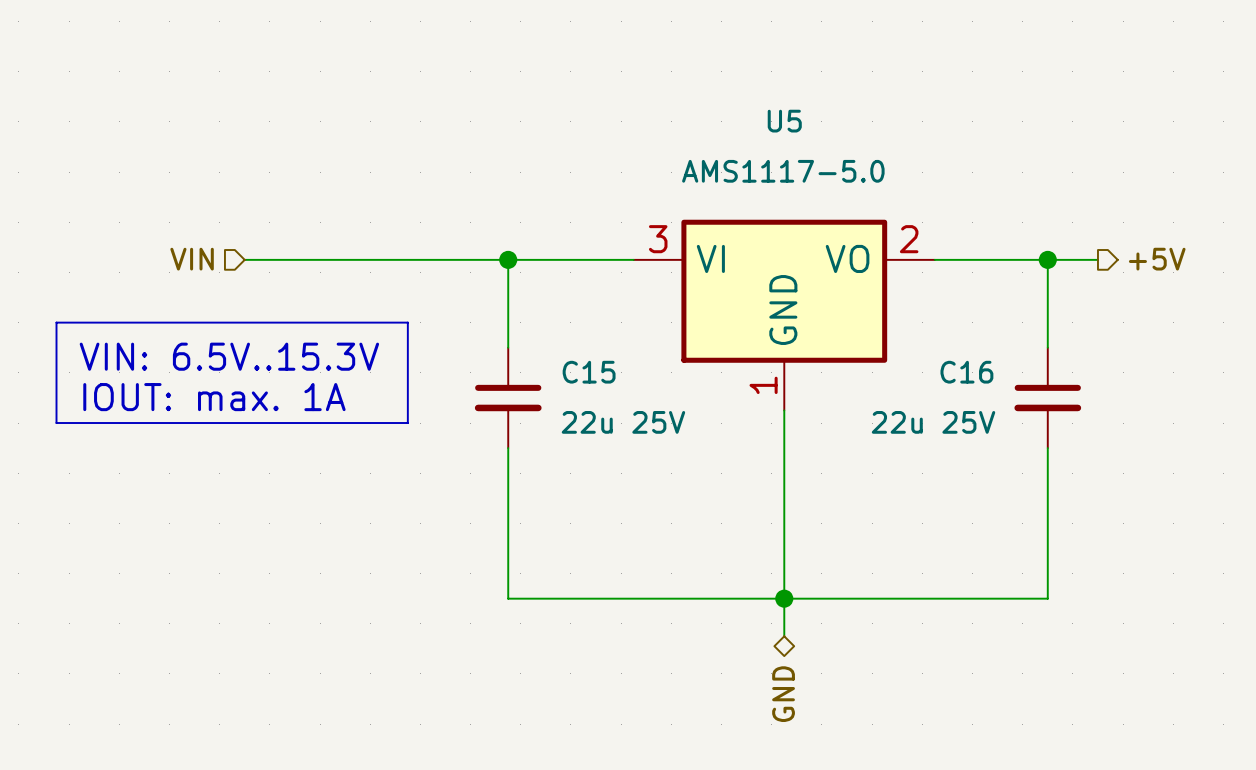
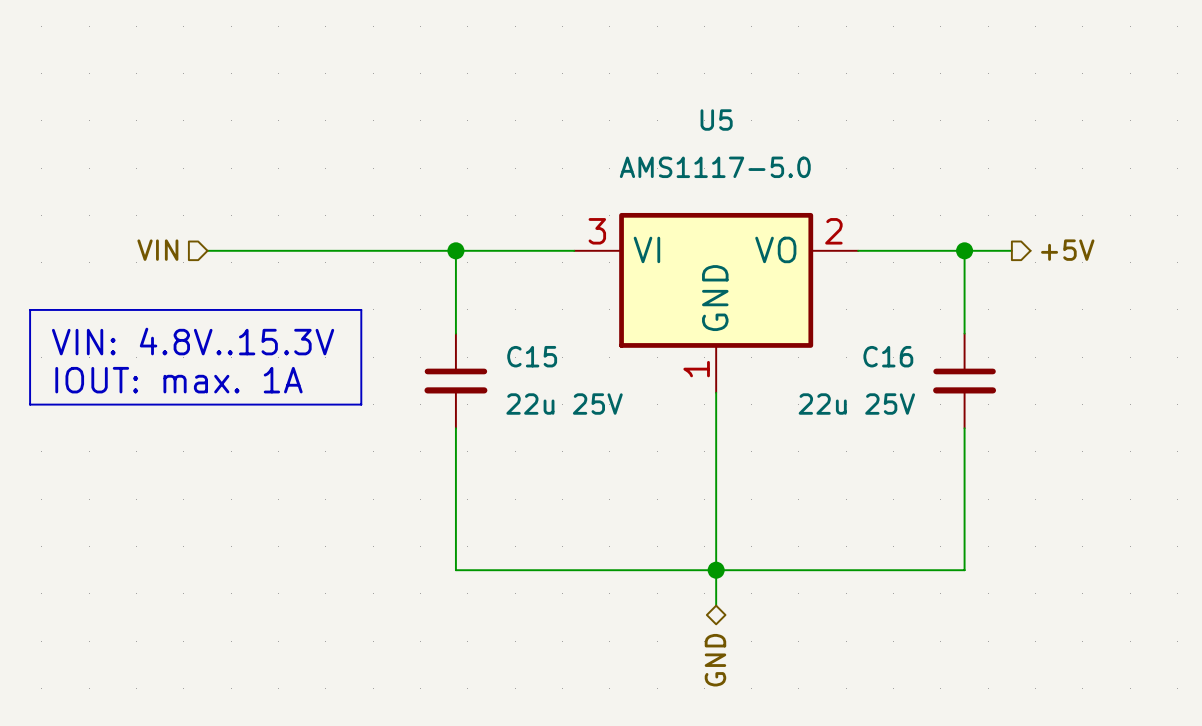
text: VIN: 6.5V..15.3V (229, 356) -> VIN: 4.8V..15.3V (193, 341)

